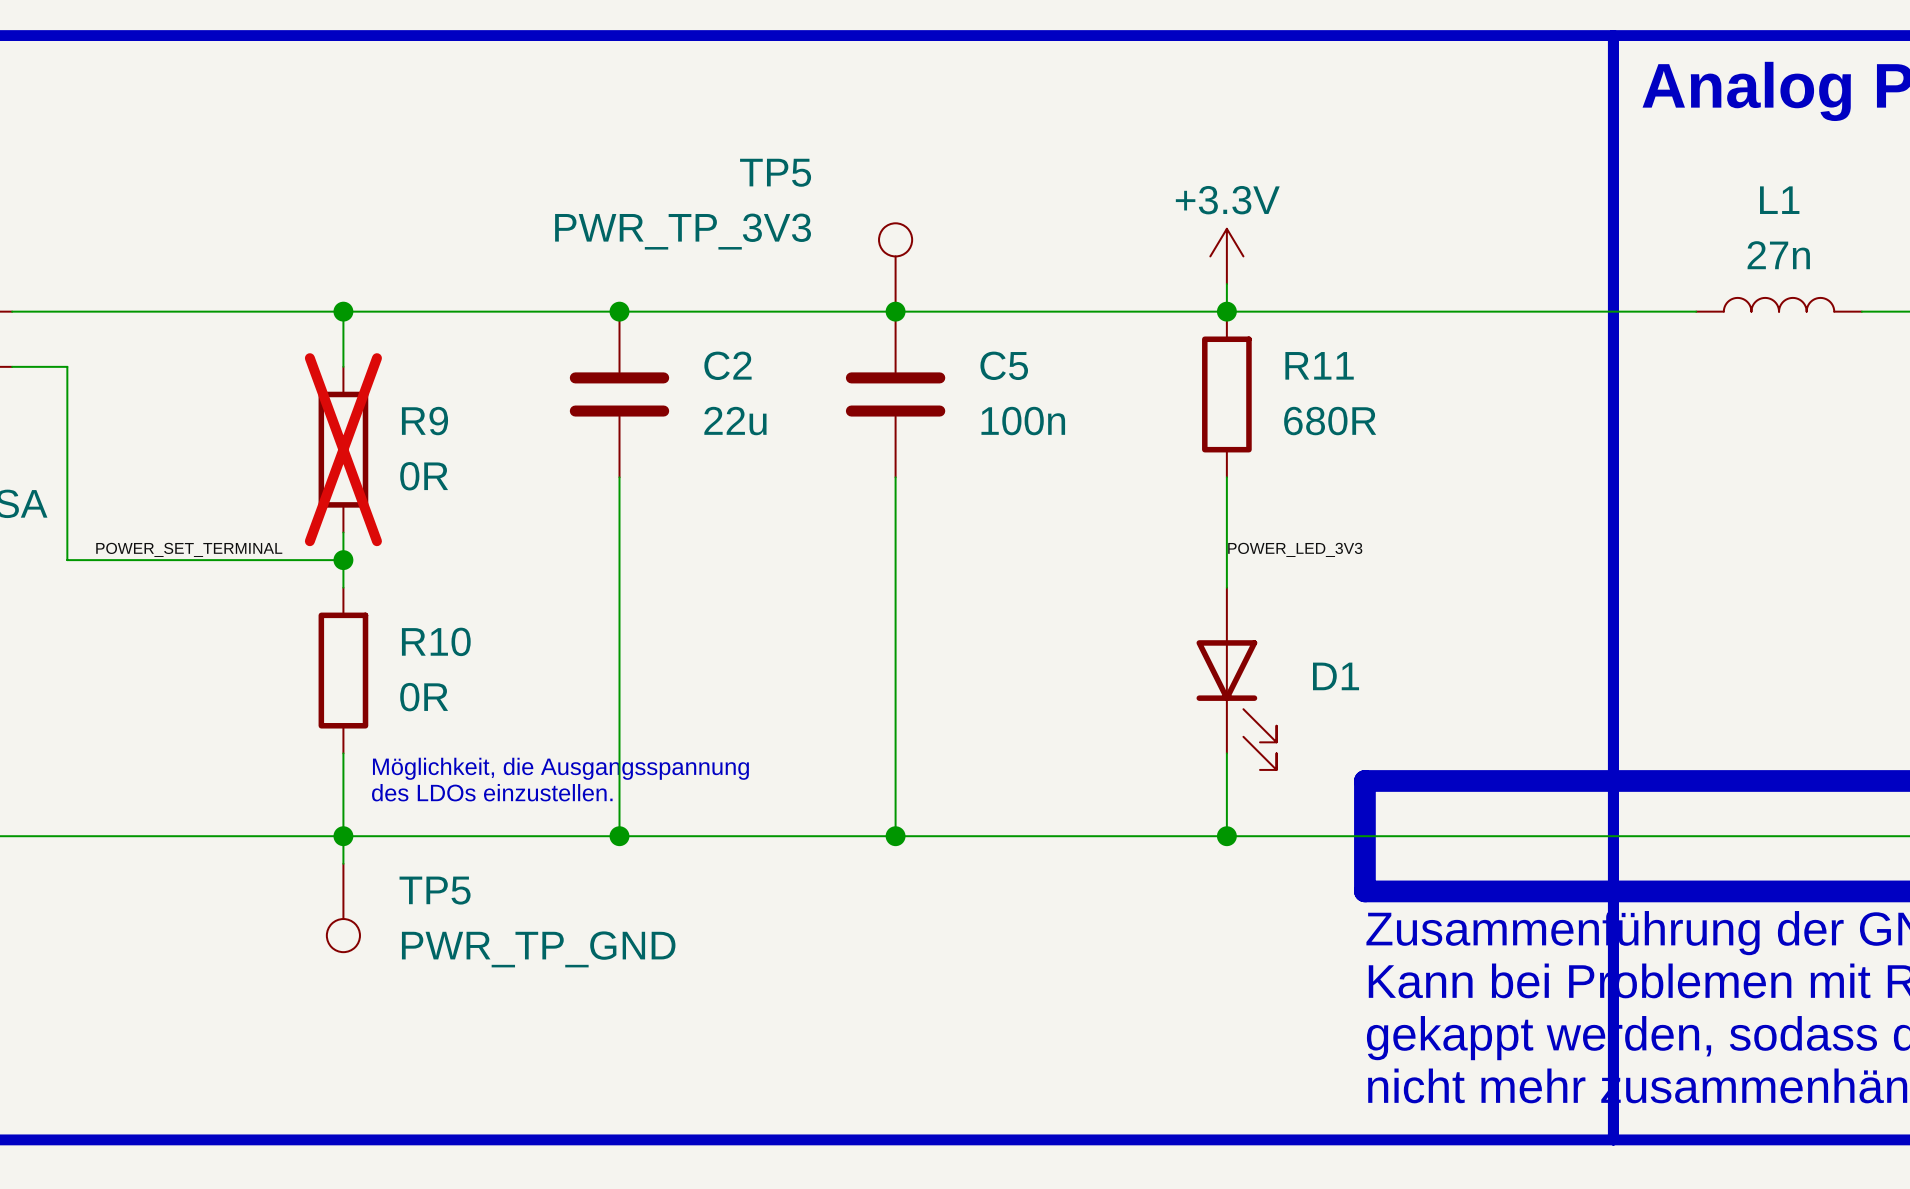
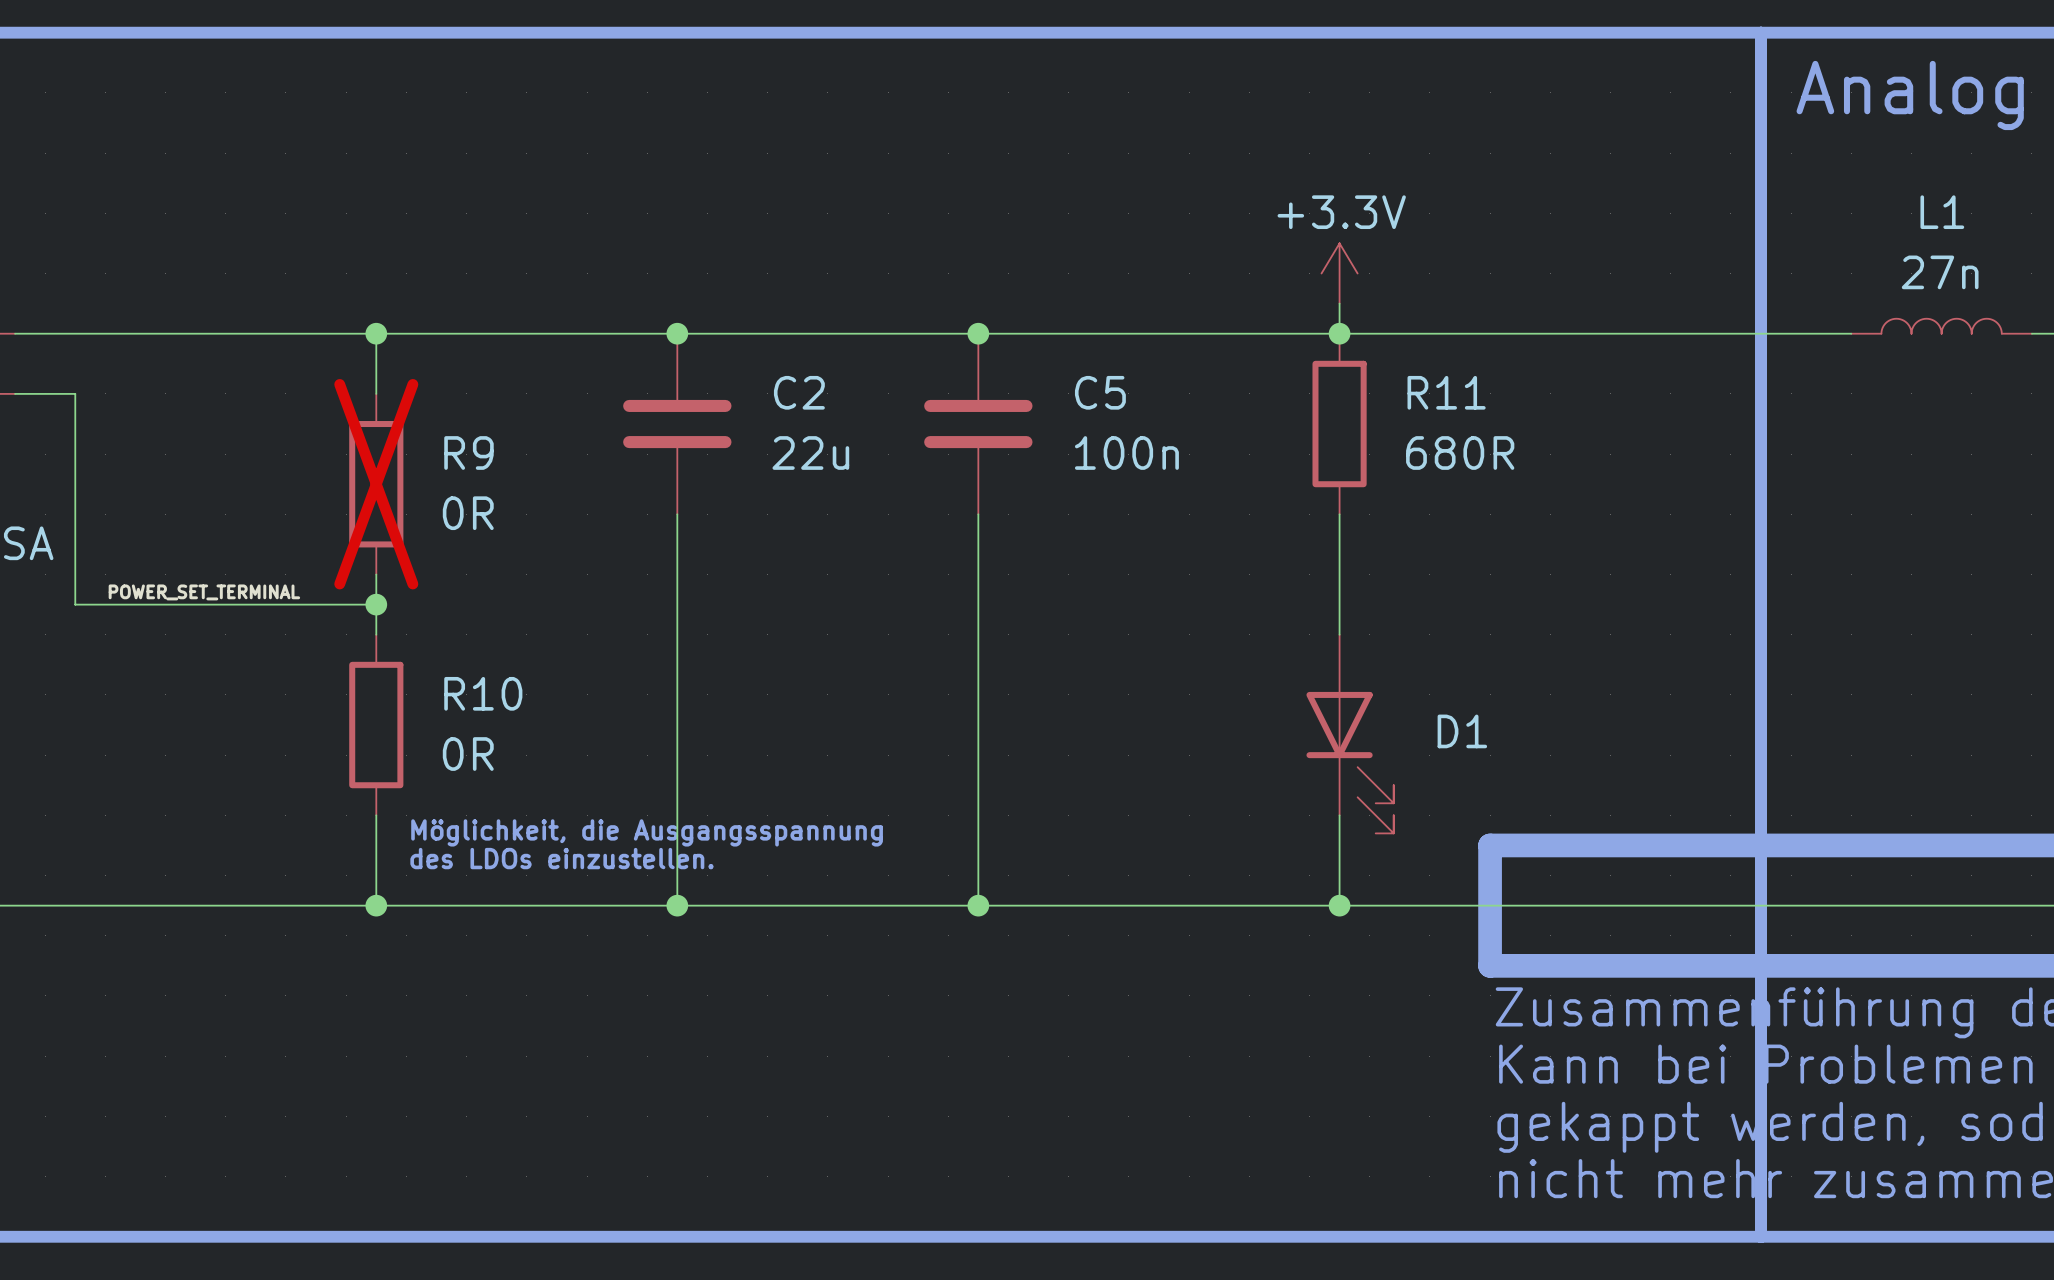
TP5: PWR_TP_3V3 (895, 267) -> none
label: POWER_LED_3V3 (1295, 549) -> none
wire: (343, 836) (343, 863) -> none
TP5: PWR_TP_GND (343, 907) -> none

